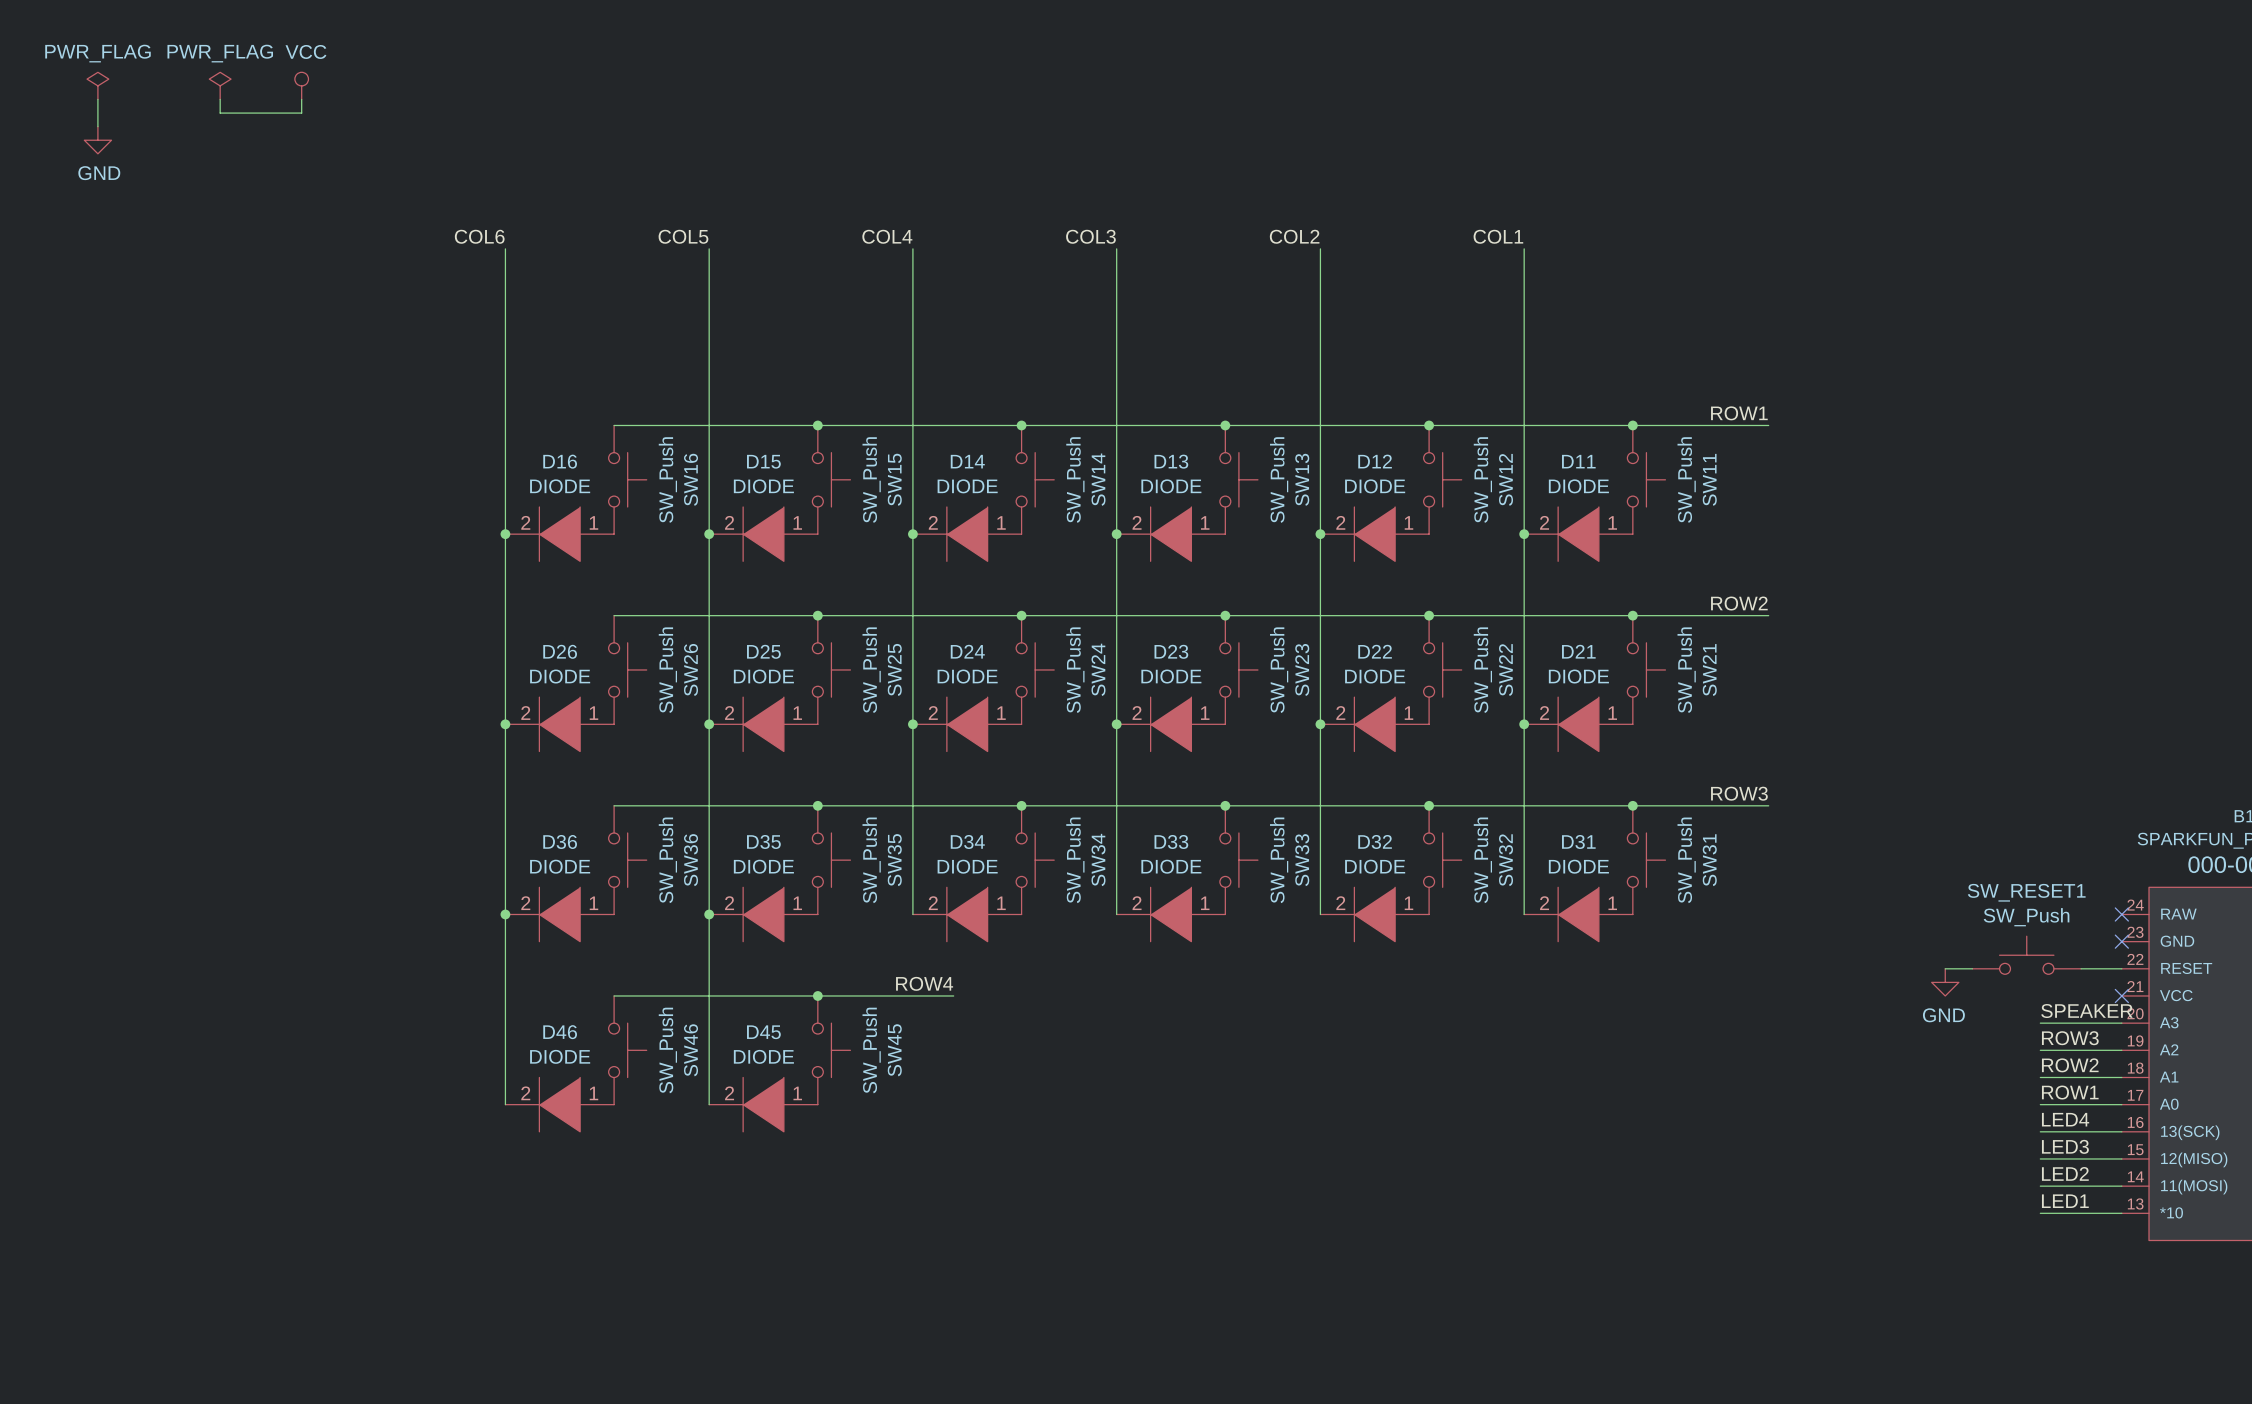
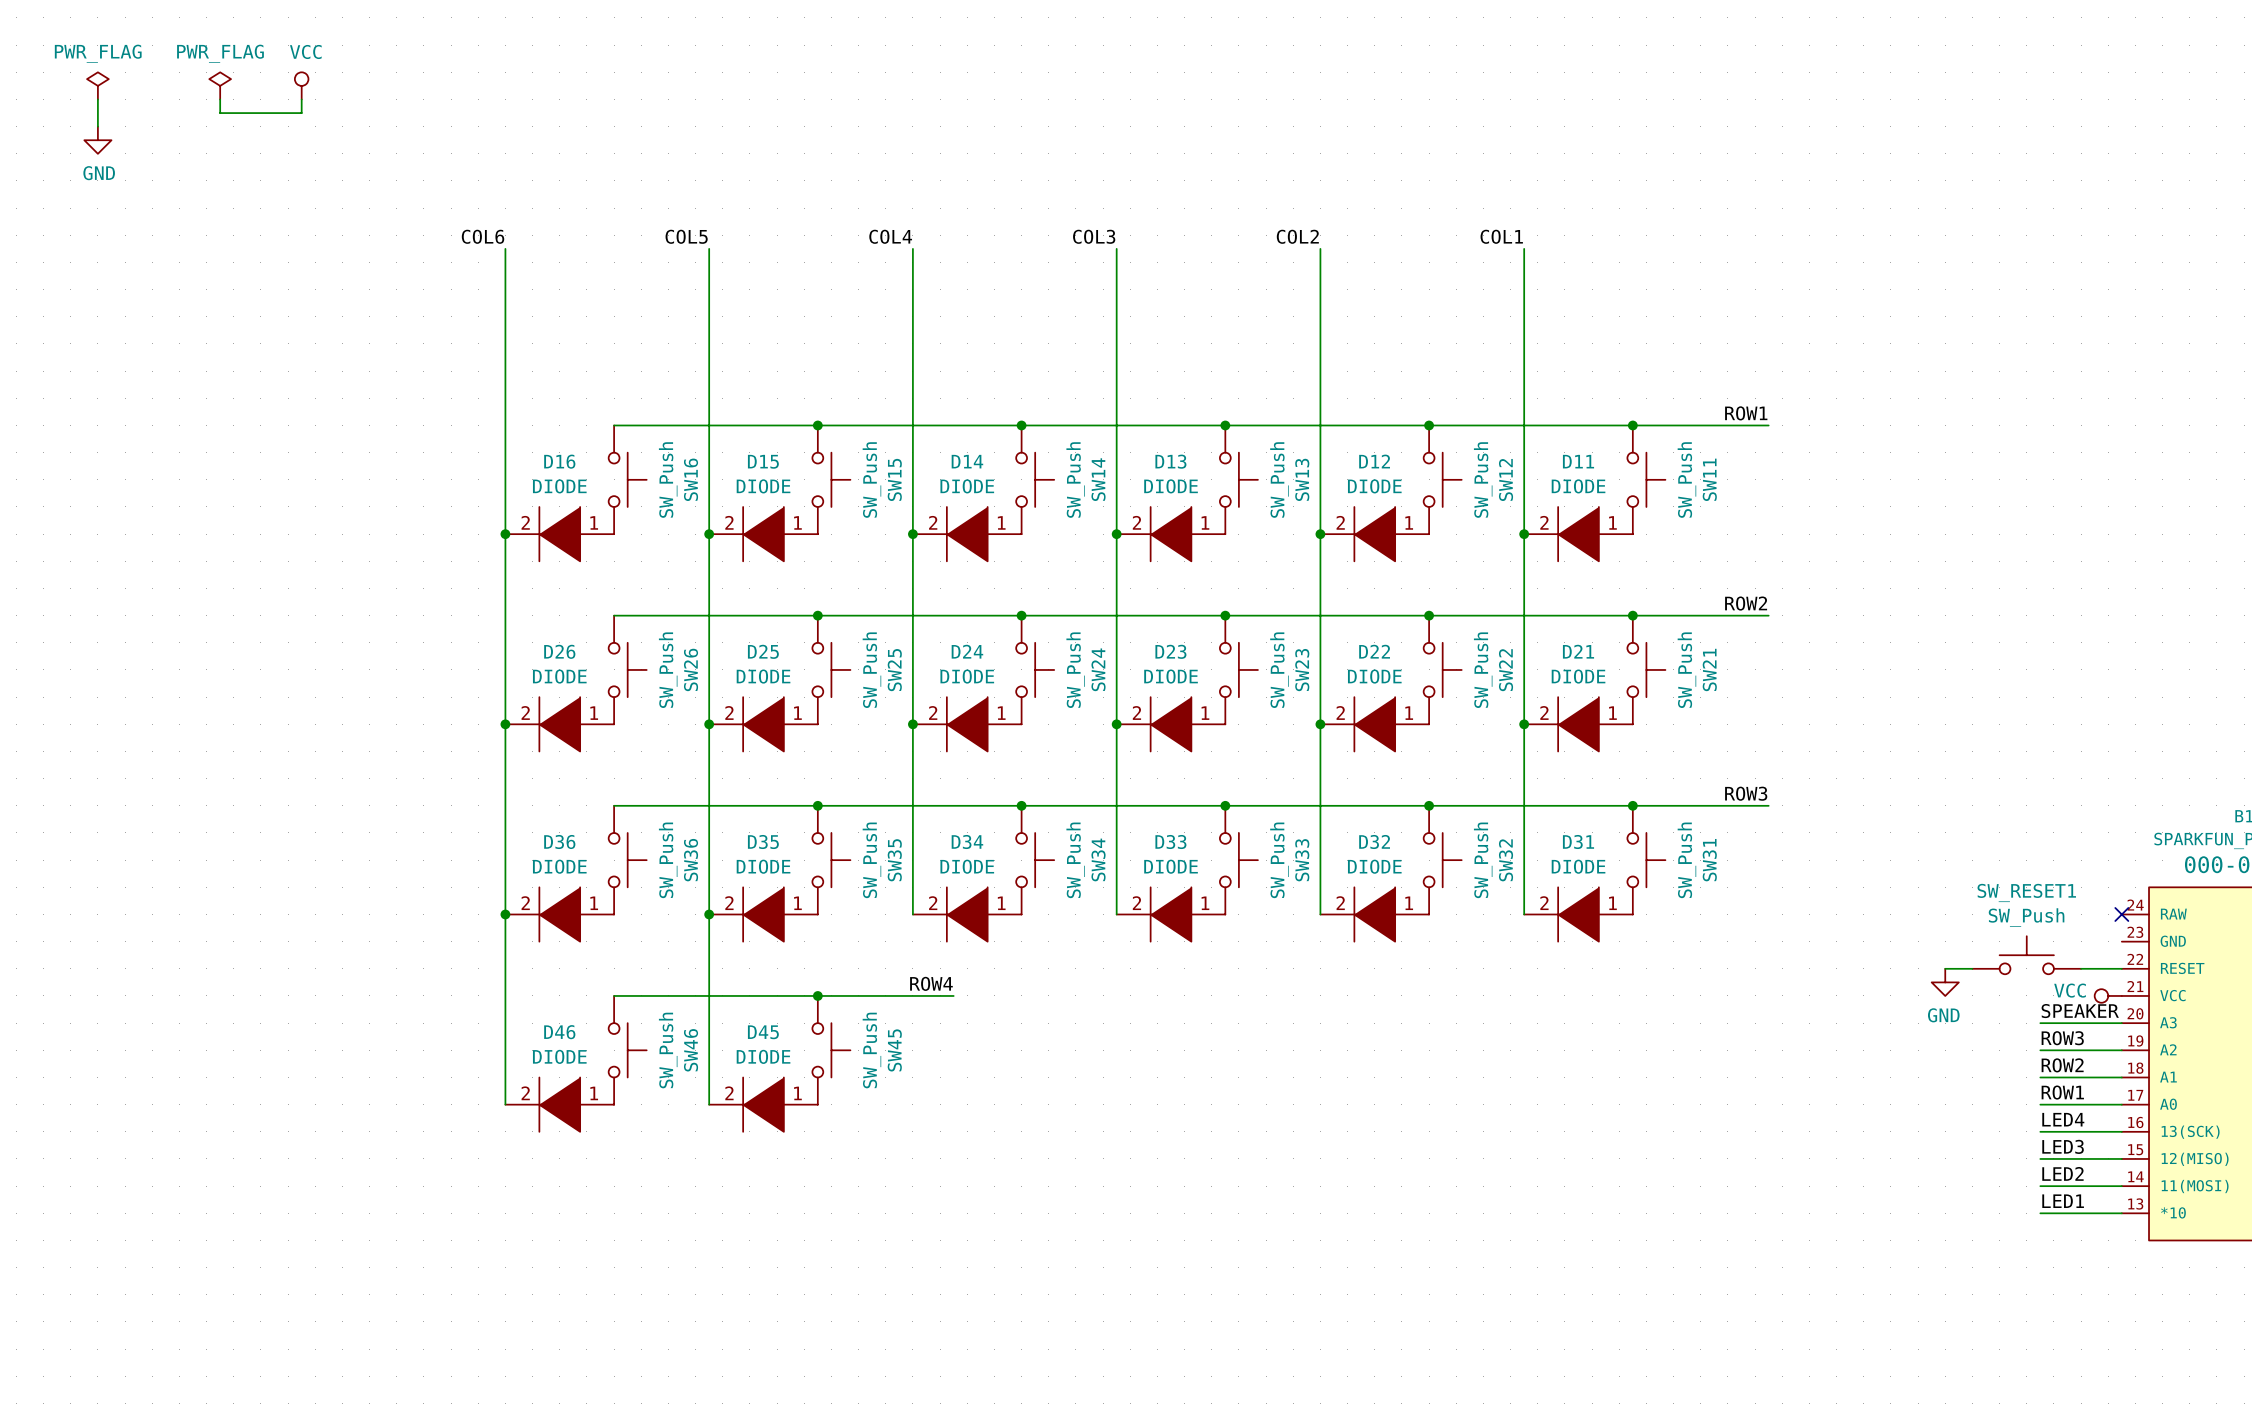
no-connect mark: (2121, 941) -> none
power symbol: none -> VCC (2108, 995)
no-connect mark: (2121, 995) -> none

